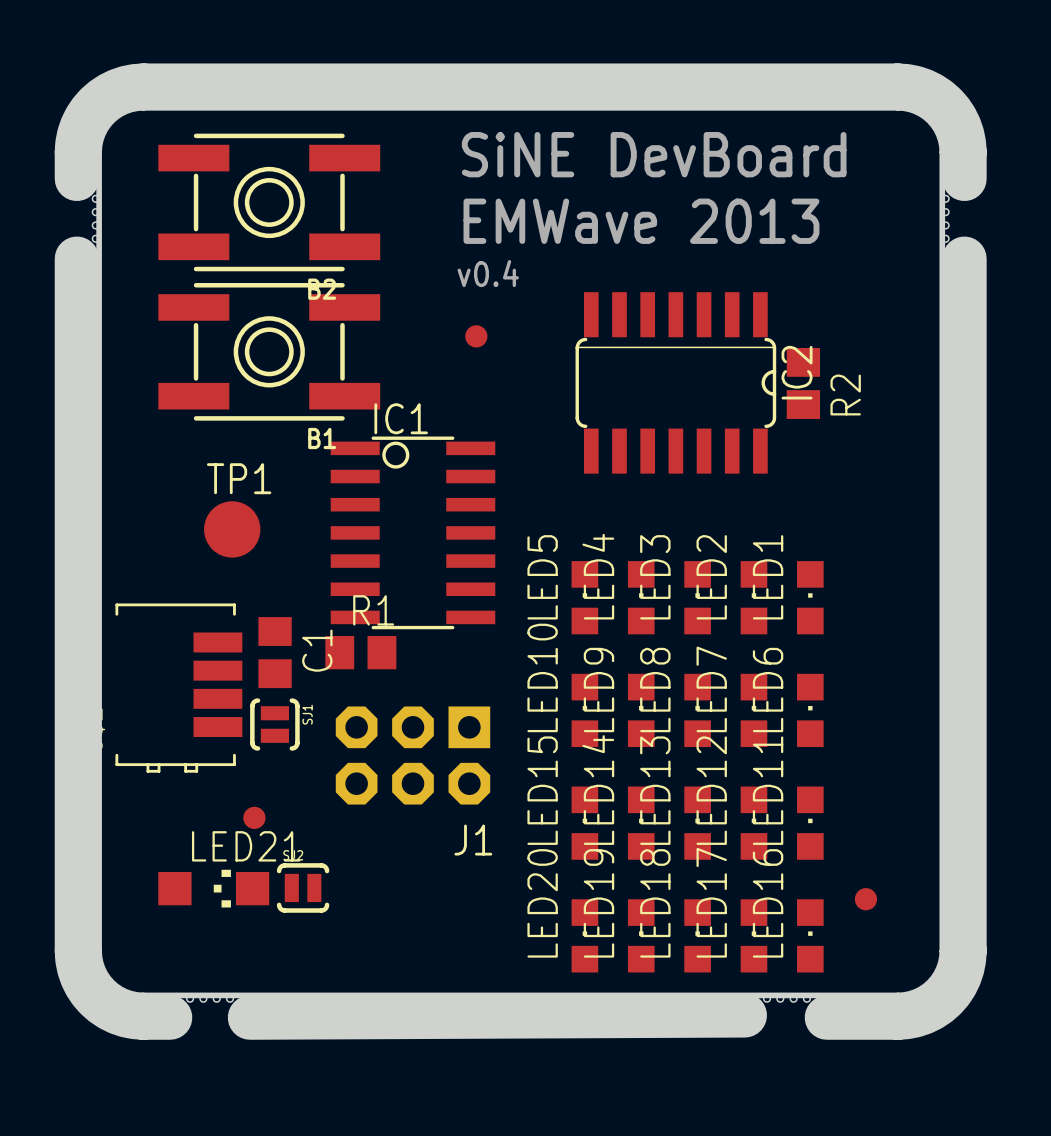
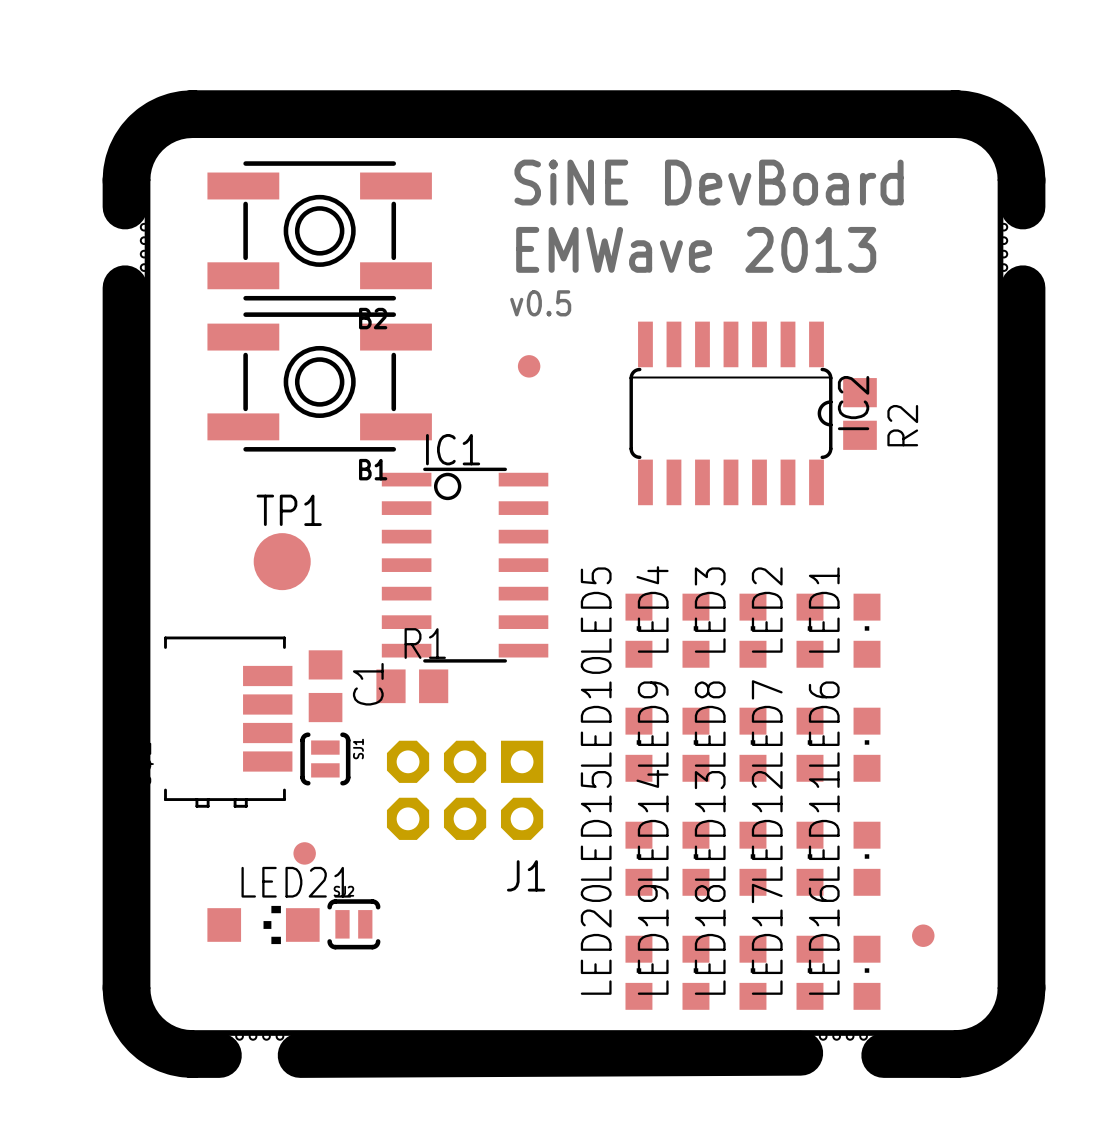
text: v0.4 (488, 273) -> v0.5 (540, 303)

